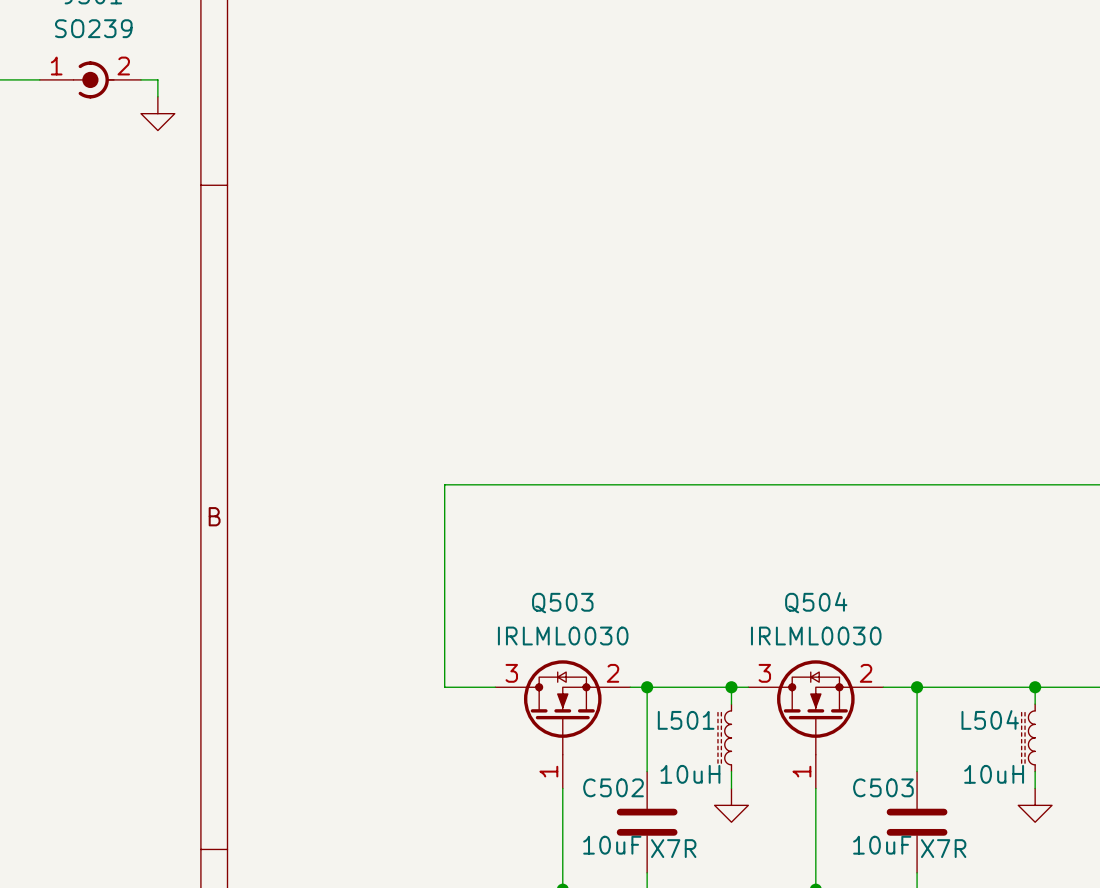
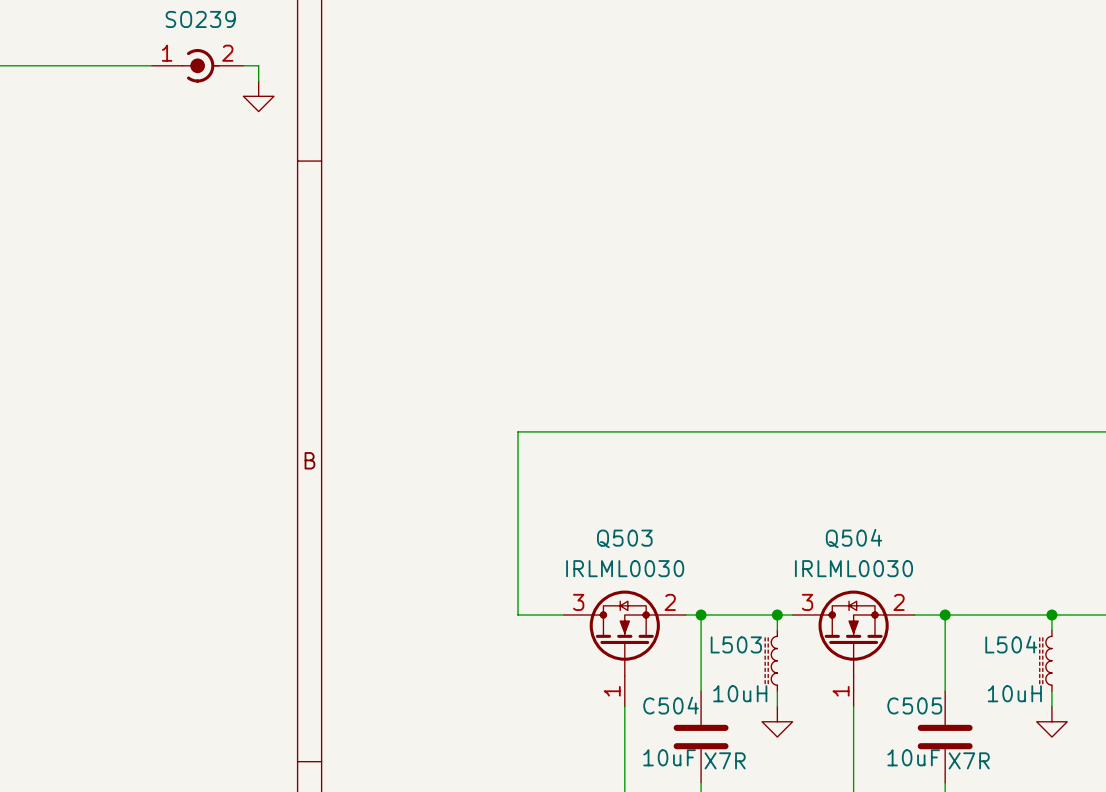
L501 name: L501 (686, 720) -> L503 (736, 644)
C502 name: C502 (613, 787) -> C504 (671, 705)
C503 name: C503 (883, 787) -> C505 (914, 705)

